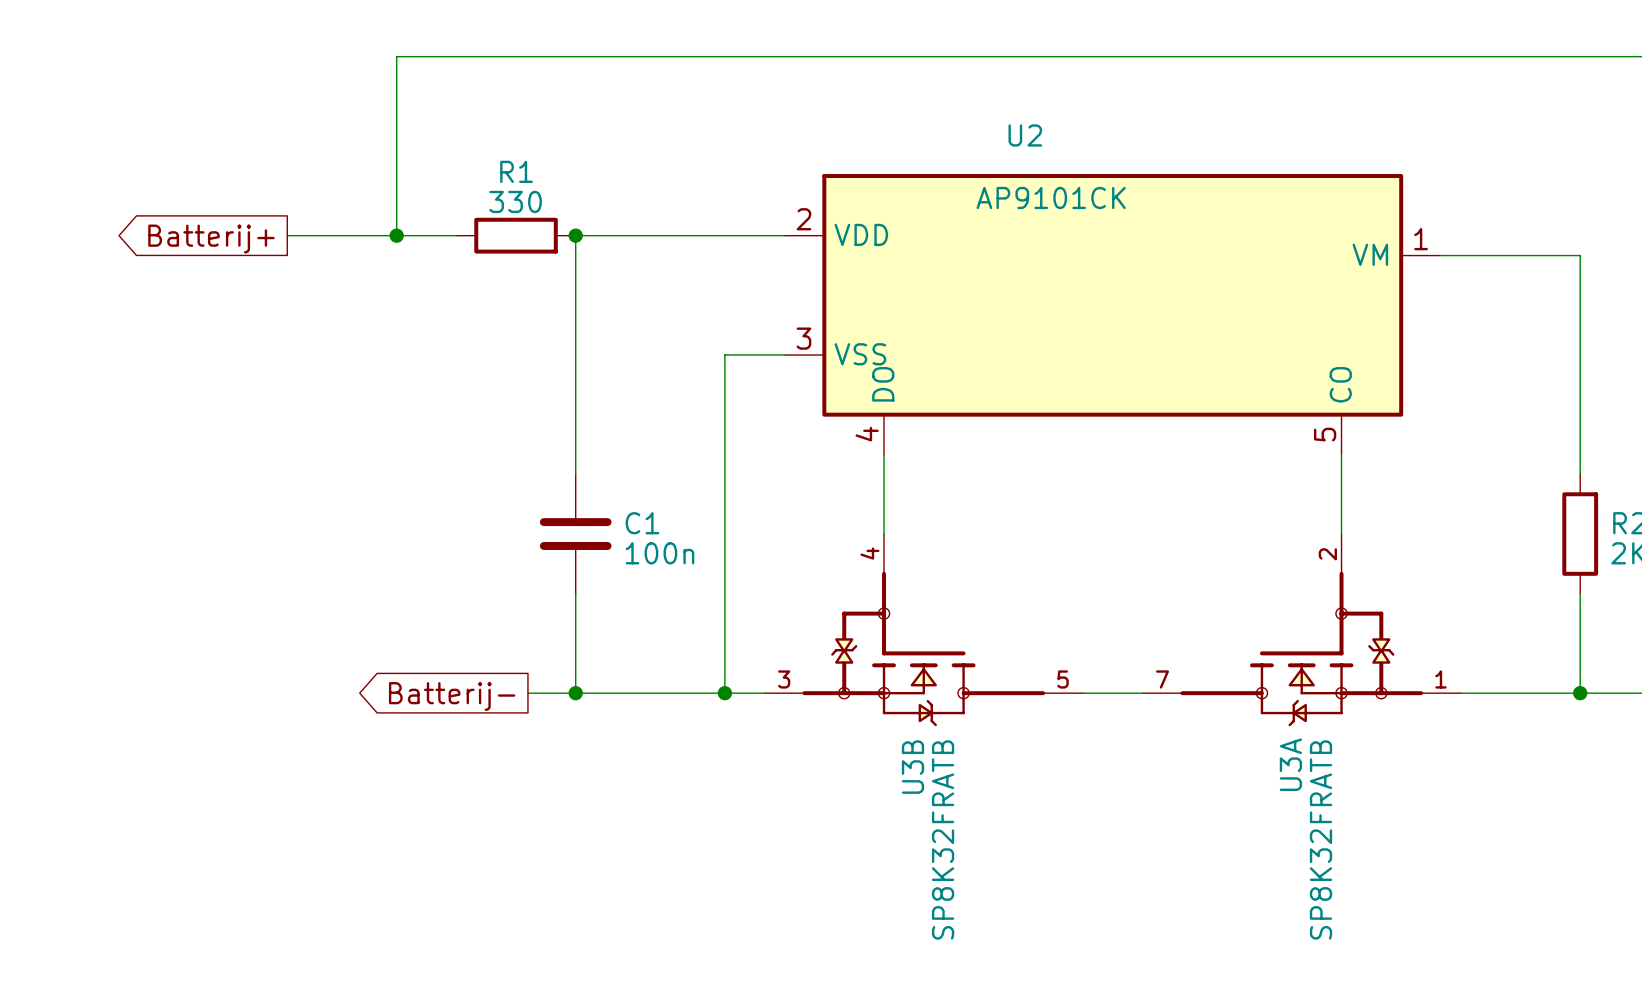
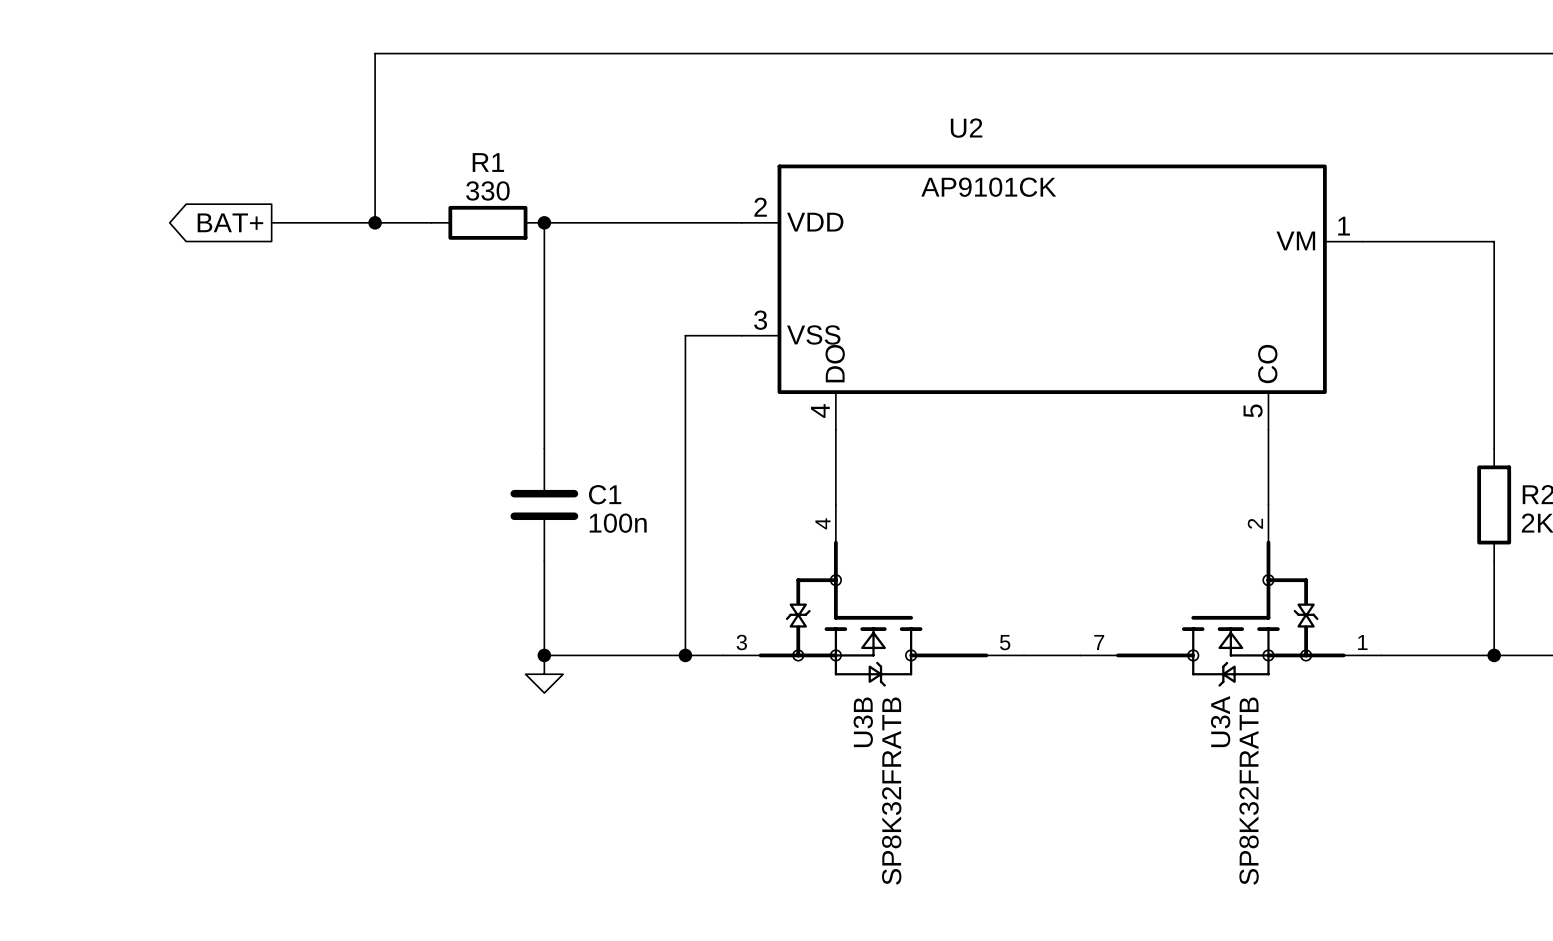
global label: Batterij+ (211, 238) -> BAT+ (230, 222)
wire: (527, 693) (575, 693) -> none
global label: Batterij- (452, 696) -> none
power symbol: none -> (544, 674)

